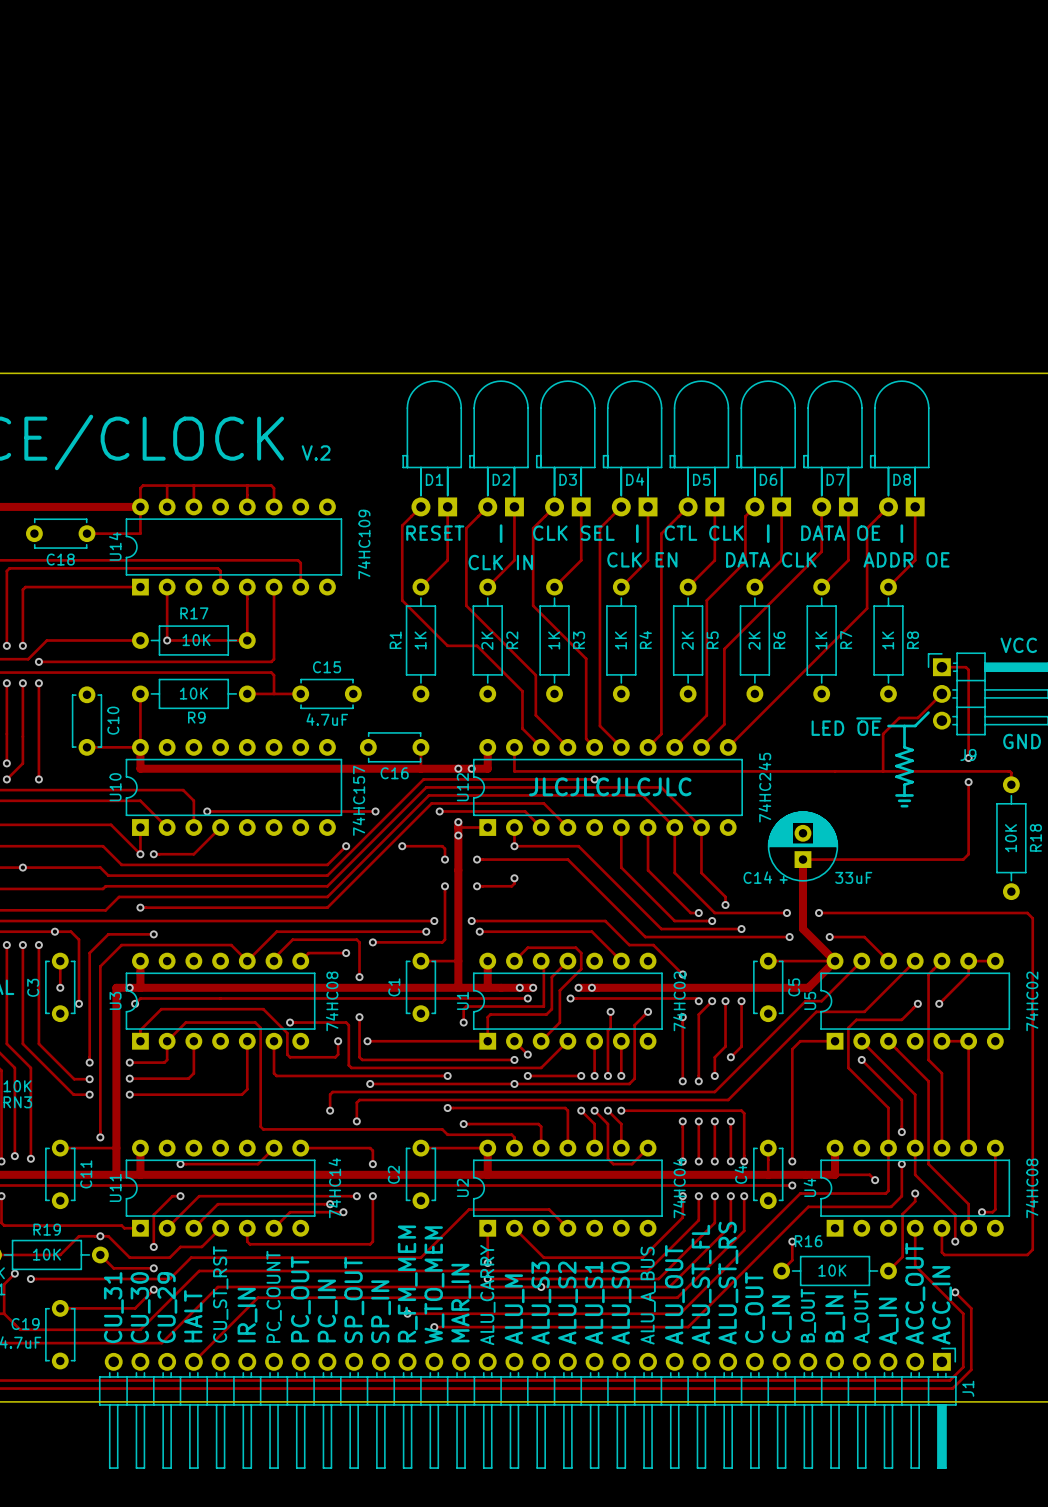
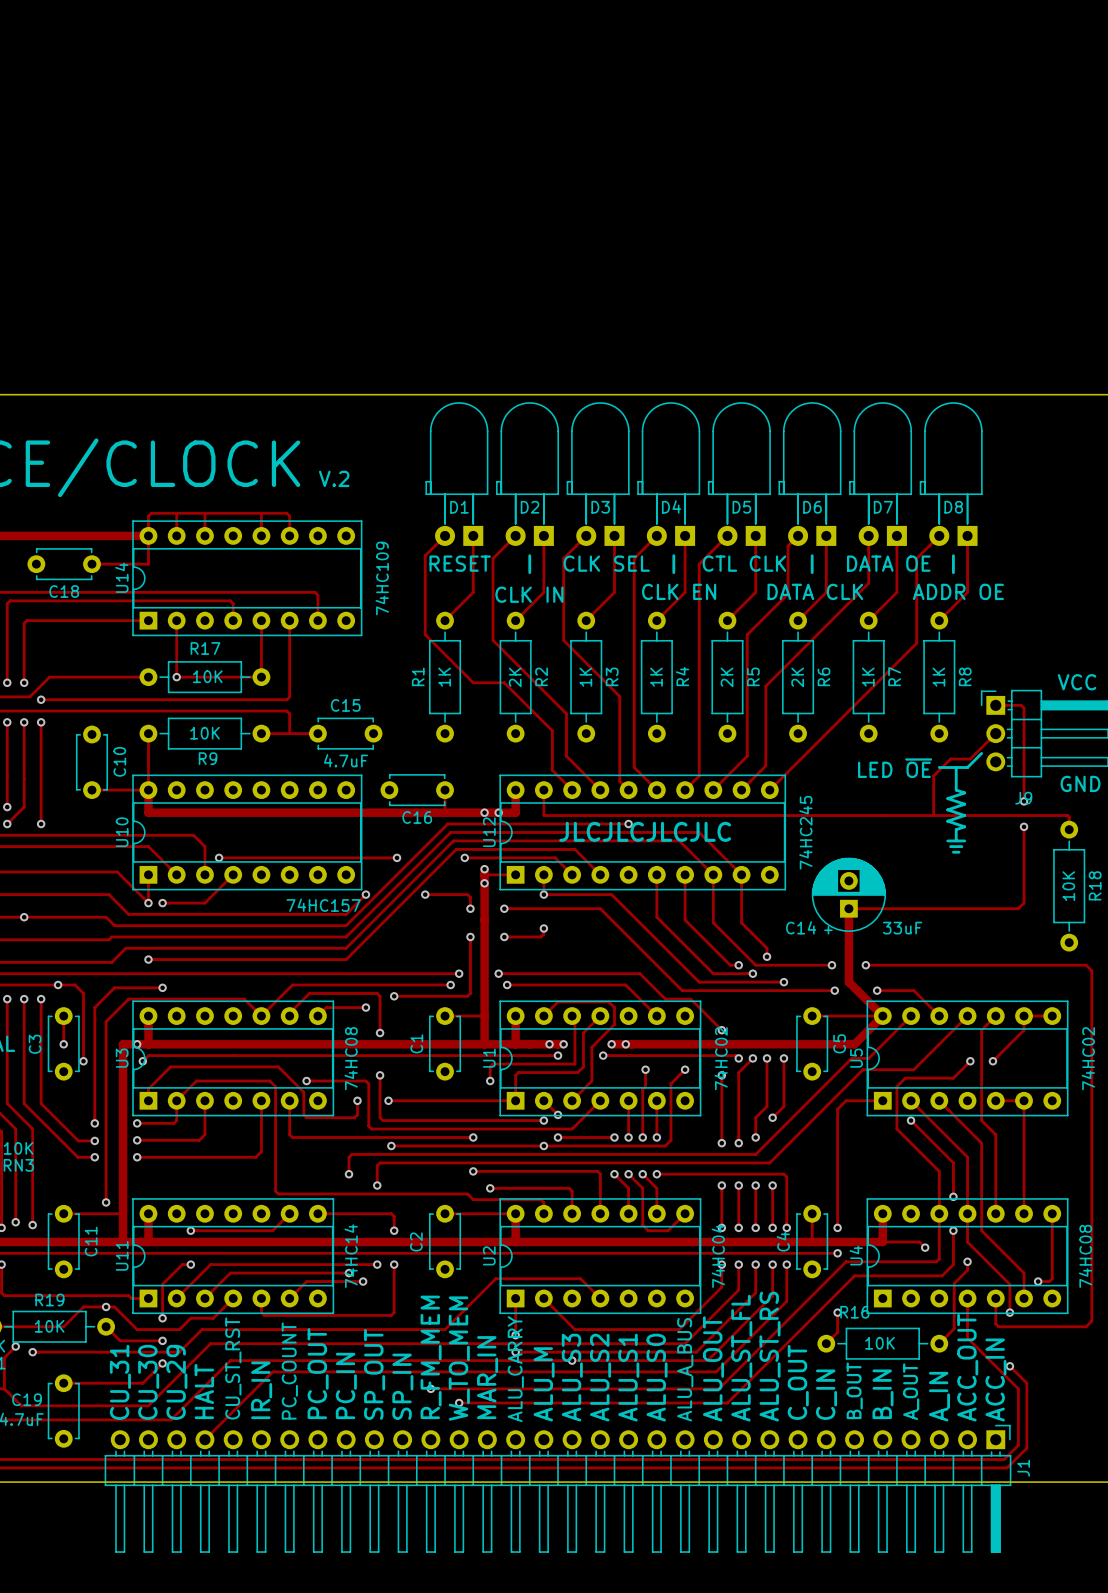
U14 footprint: [125, 498, 343, 596] -> [132, 520, 363, 637]
U10 footprint: [125, 738, 343, 836] -> [132, 774, 363, 891]
U12 footprint: [473, 738, 743, 836] -> [499, 774, 786, 891]
U10 value position: 74HC157 (358, 800) -> 74HC157 (323, 905)
U3 footprint: [125, 952, 316, 1050] -> [132, 1000, 335, 1117]
U1 footprint: [473, 952, 663, 1050] -> [499, 1000, 702, 1117]
U5 footprint: [820, 952, 1010, 1050] -> [866, 1000, 1069, 1117]
U11 footprint: [125, 1139, 316, 1237] -> [132, 1198, 335, 1314]
U2 footprint: [473, 1139, 663, 1237] -> [499, 1198, 702, 1314]
U4 footprint: [820, 1139, 1010, 1237] -> [866, 1198, 1069, 1314]

